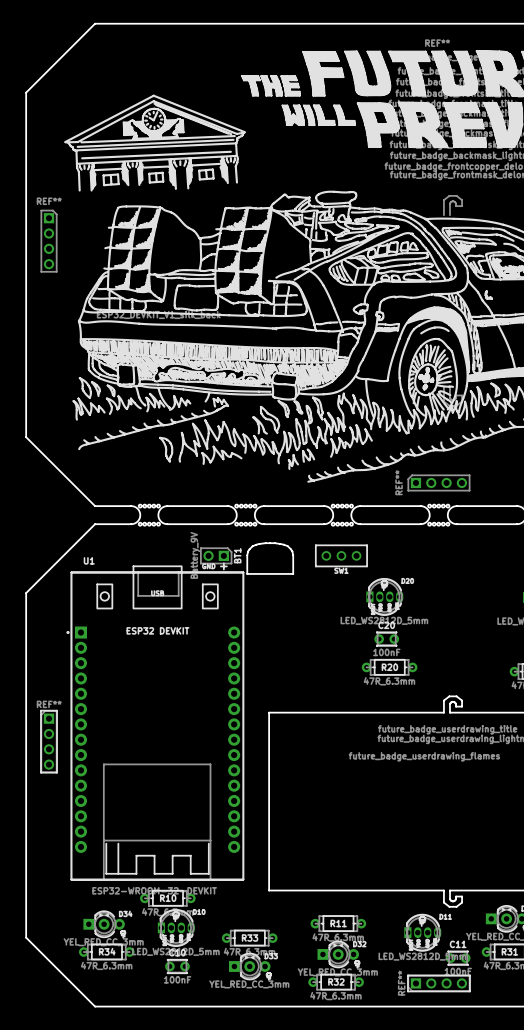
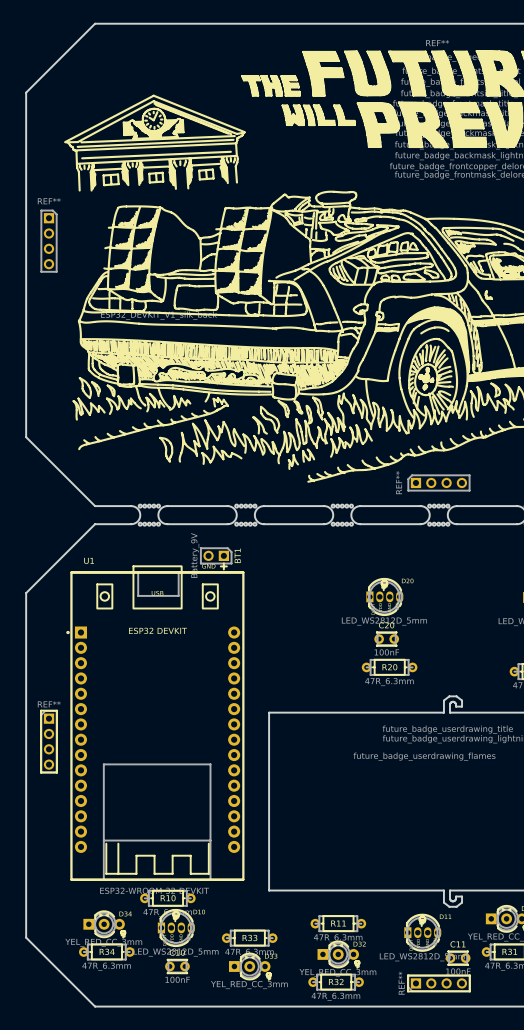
line: (443, 215) (443, 200) (449, 195) (456, 195) (462, 200) (462, 206) (456, 206) (454, 201) (451, 201) (449, 215) -> none
line: (443, 386) (443, 401) (449, 405) (456, 405) (462, 401) (462, 395) (456, 395) (454, 399) (451, 399) (449, 386) -> none
board edge: (265, 543) (284, 544) (290, 549) (293, 555) (293, 573) (247, 573) (248, 551) (252, 546) (265, 543) -> none
part: (341, 555) -> none

